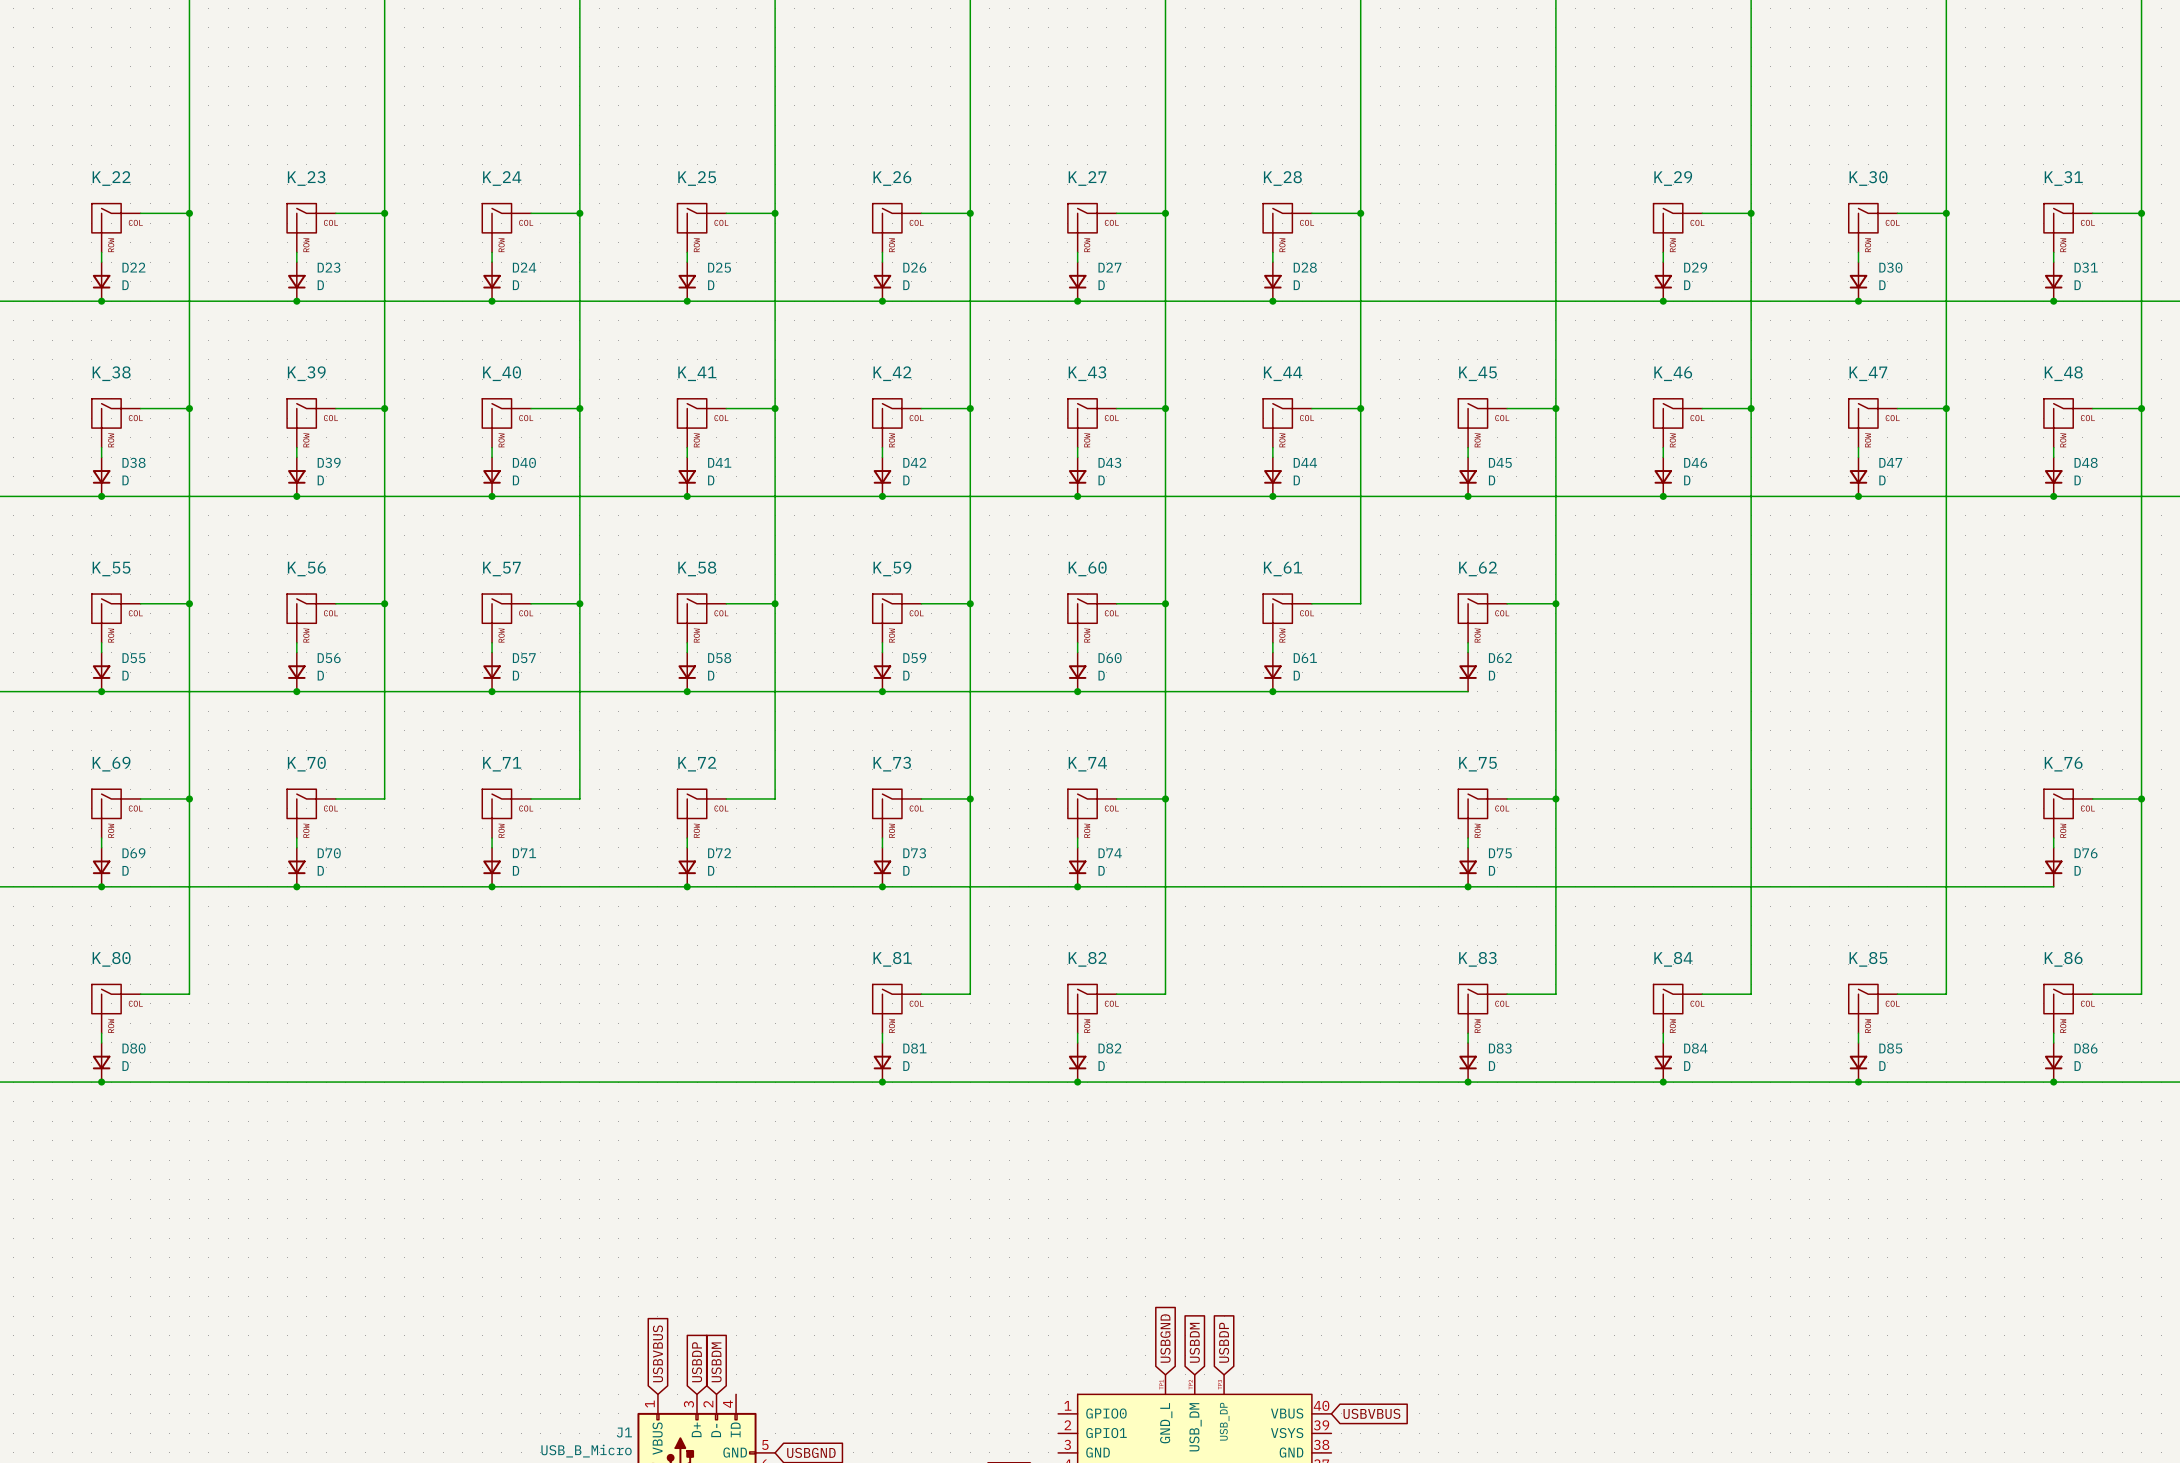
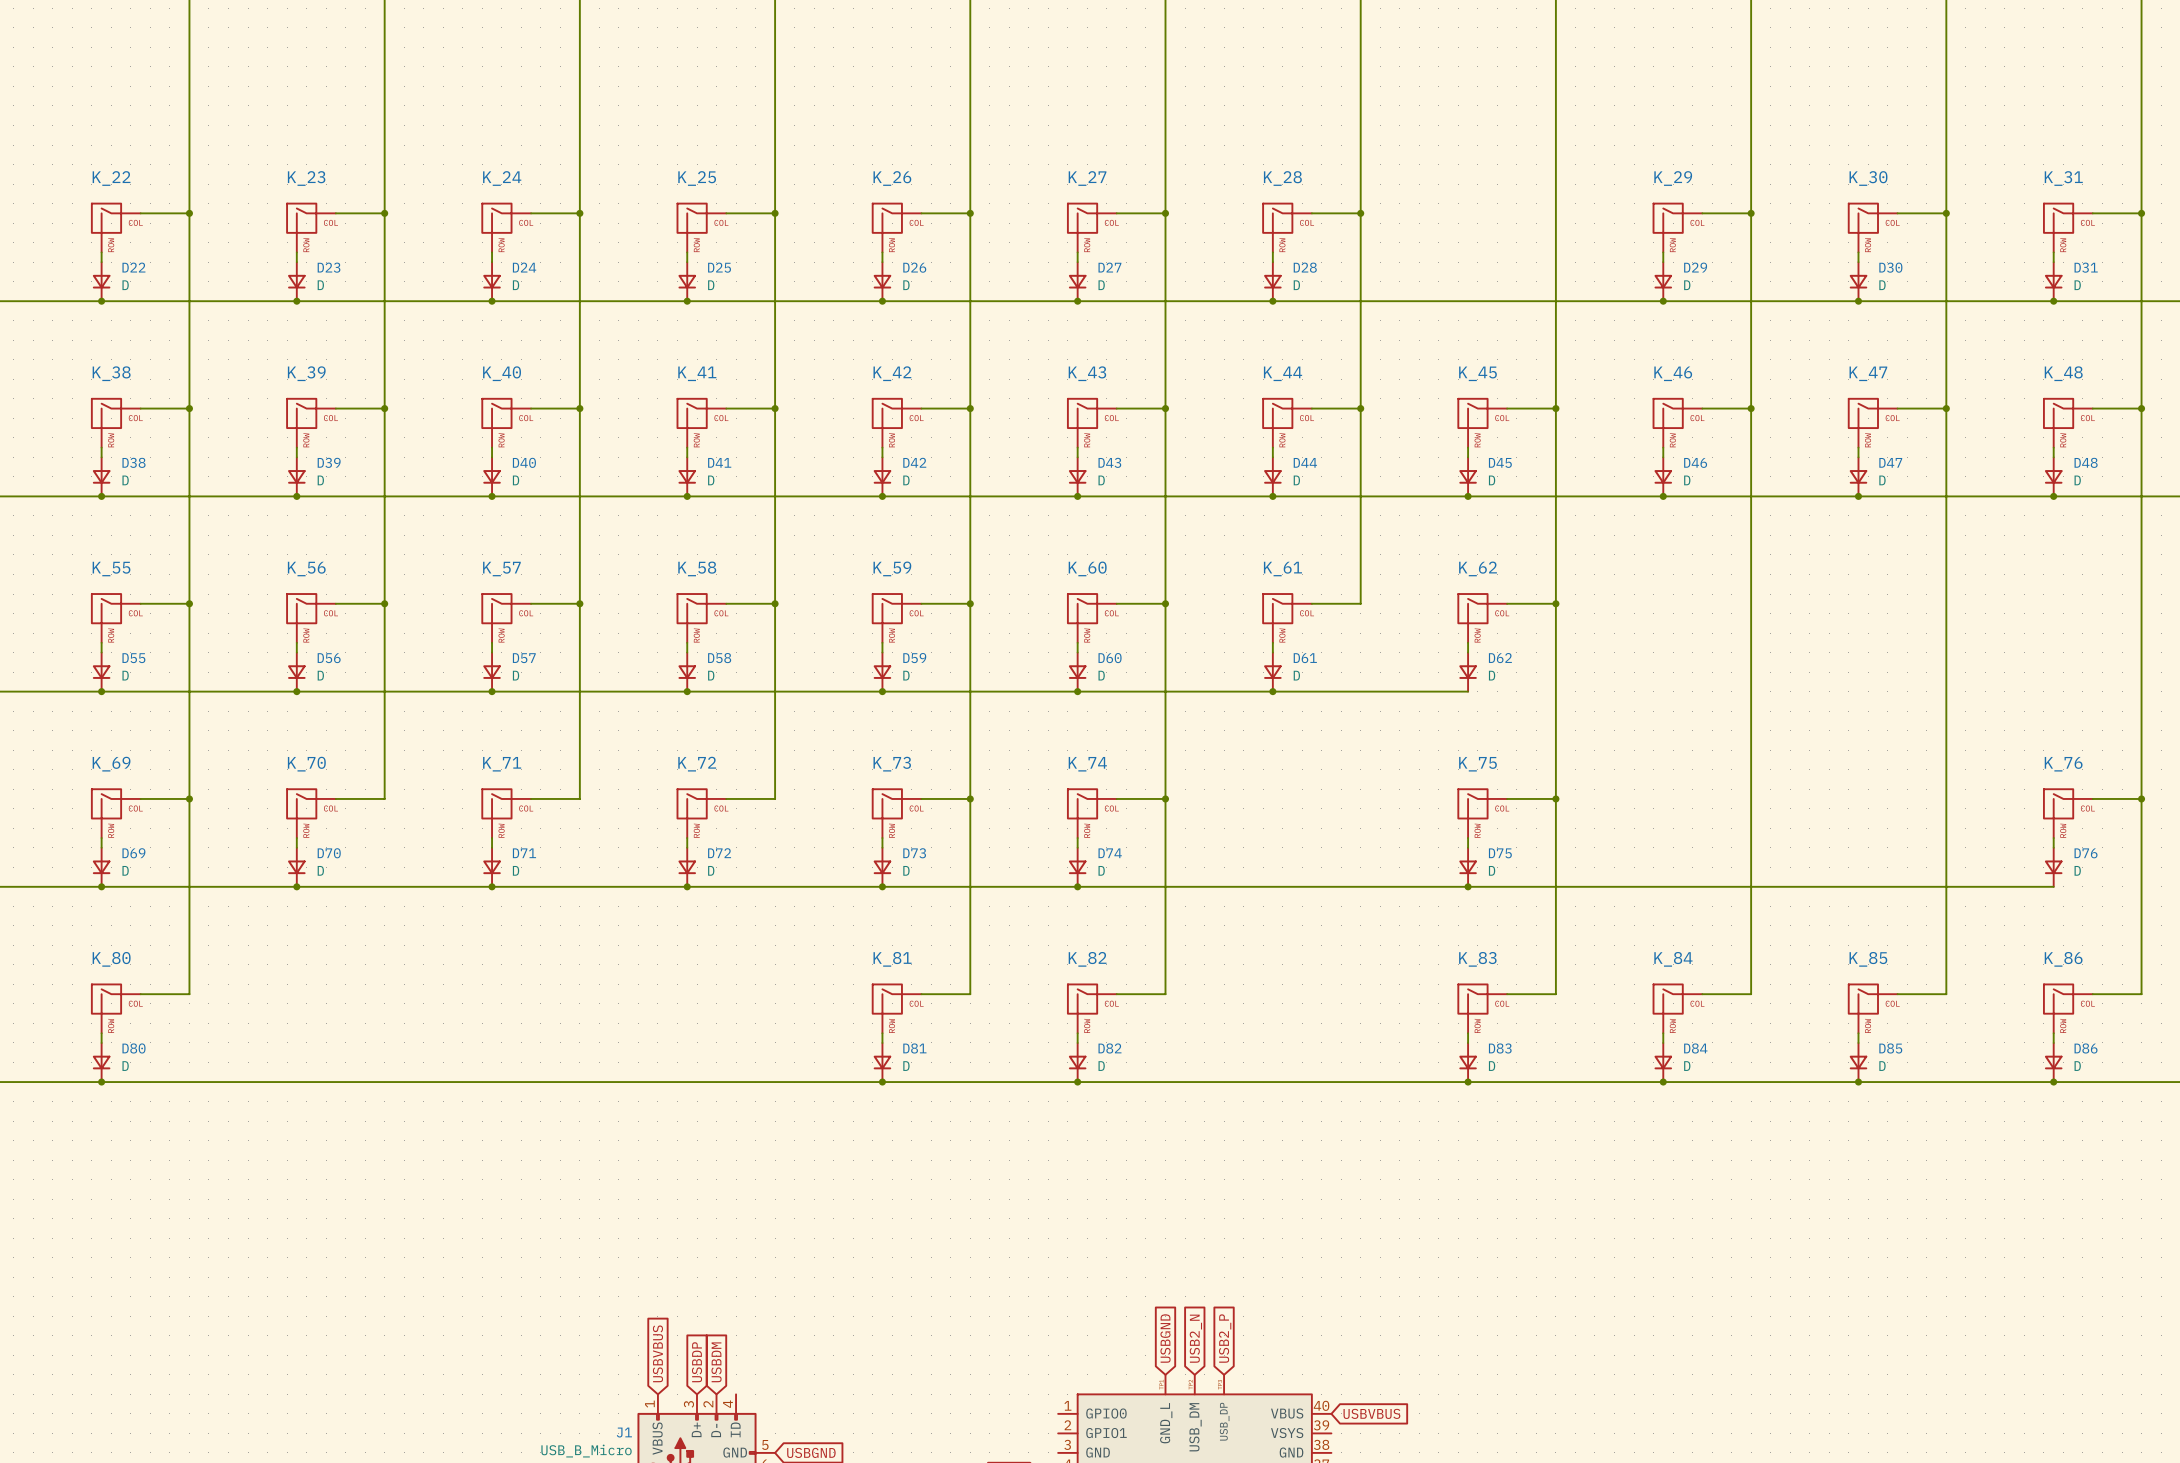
global label: USBDM (1194, 1342) -> USB2_N (1195, 1338)
global label: USBDP (1224, 1342) -> USB2_P (1225, 1338)

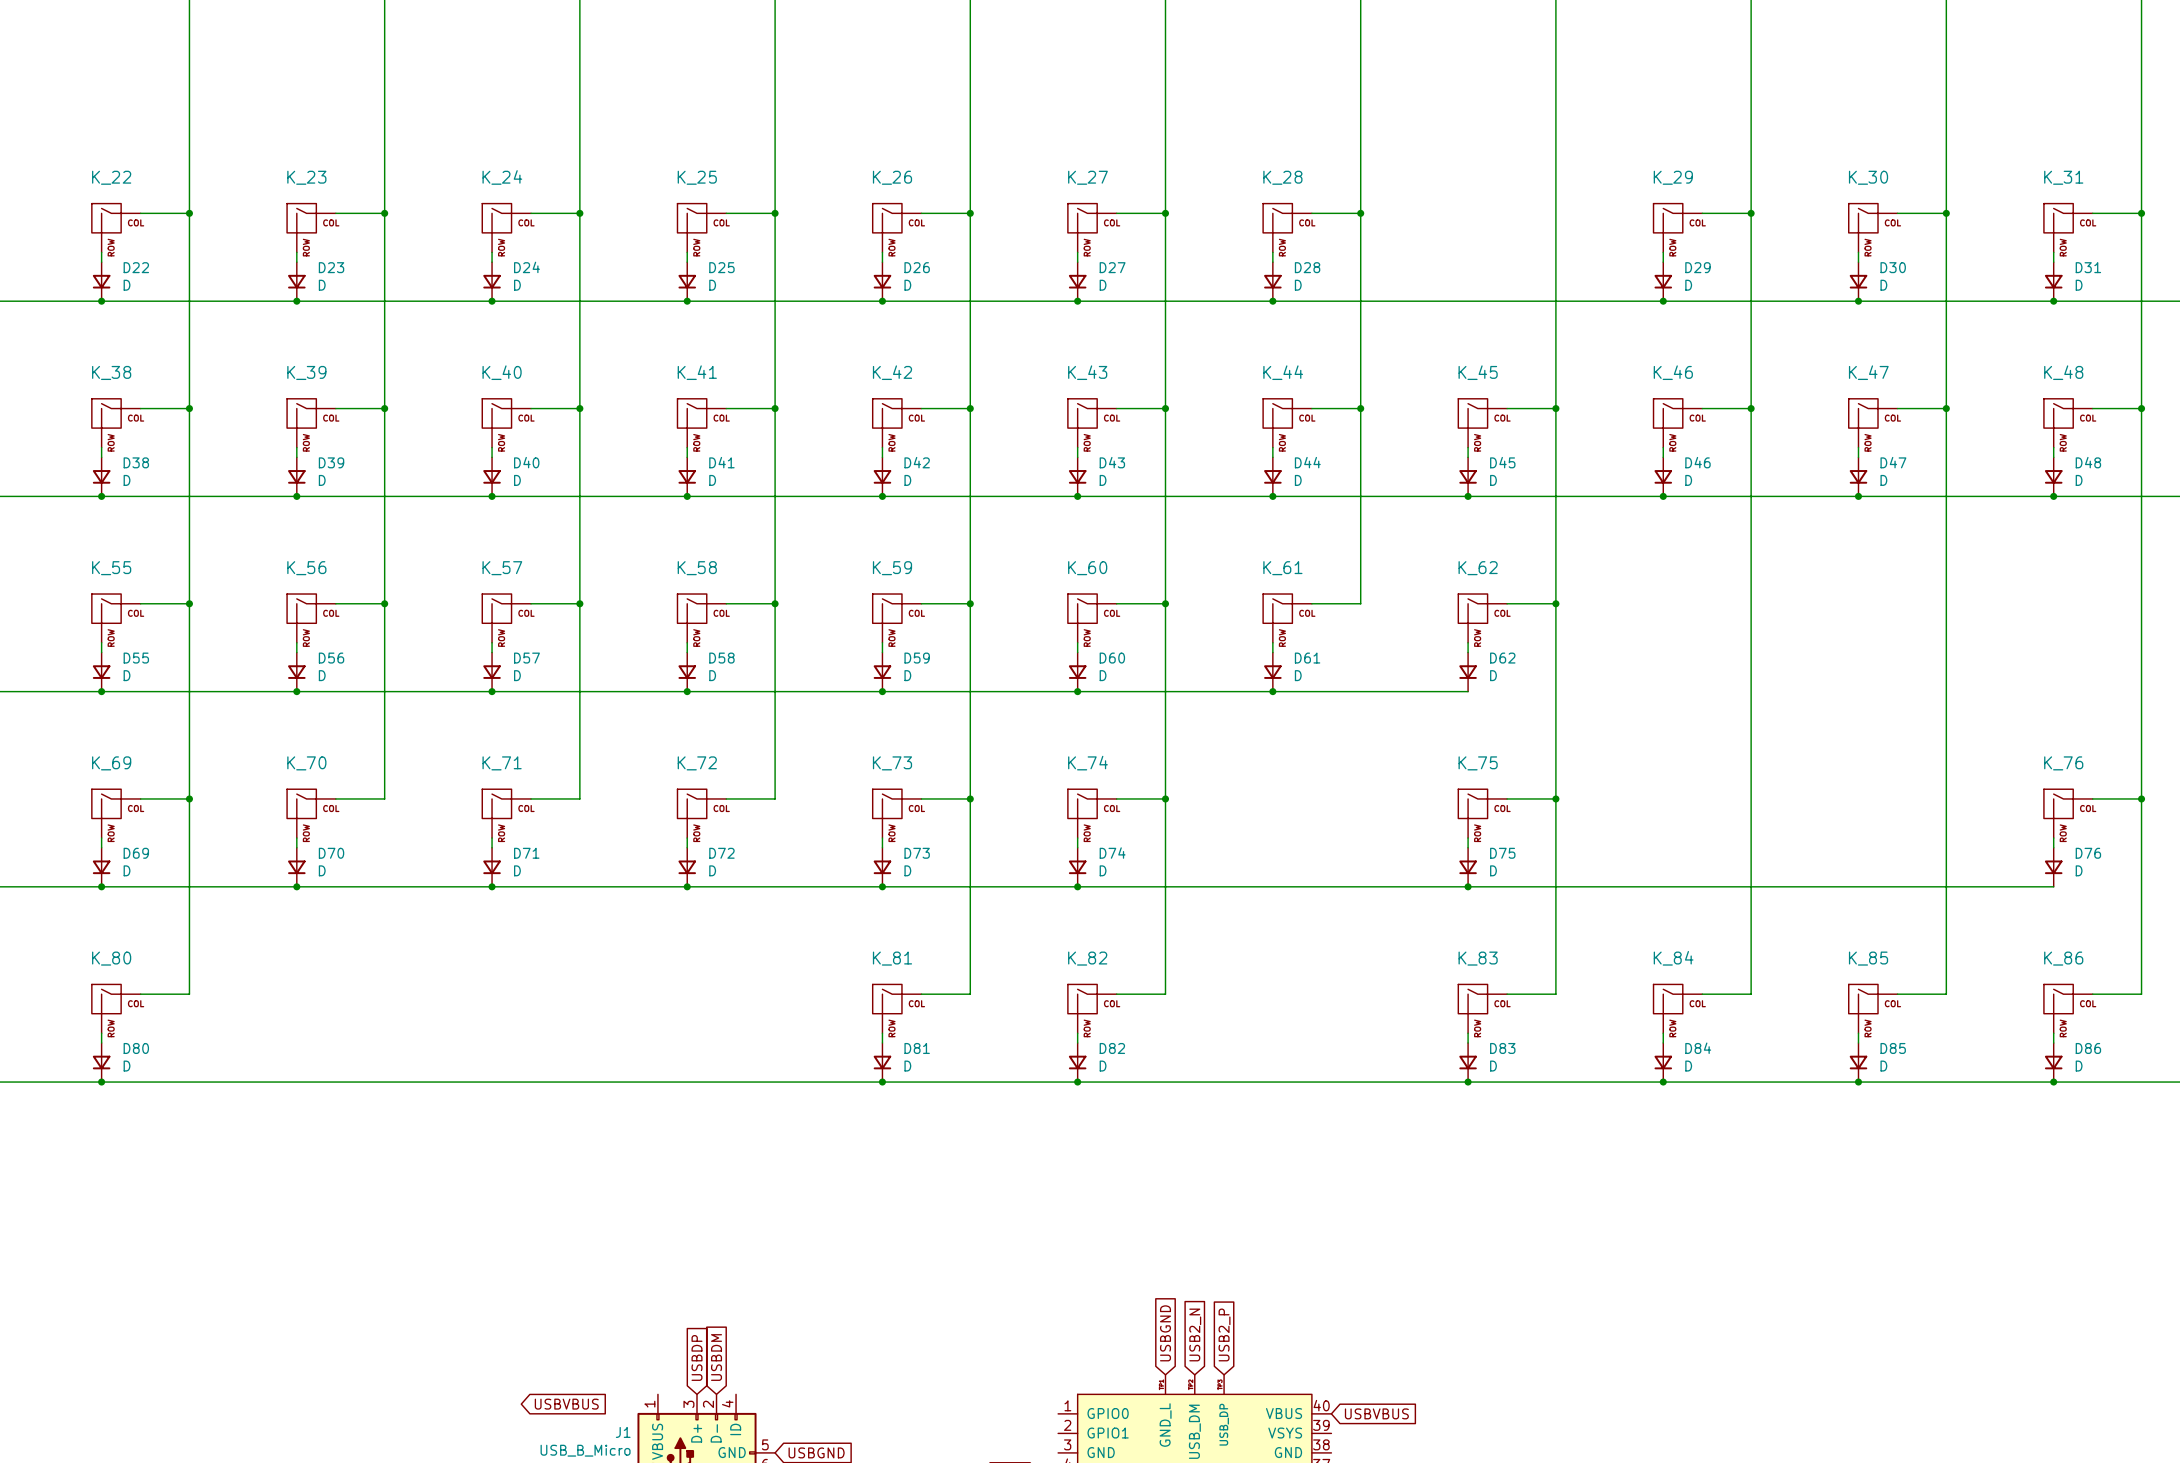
global label rotation: 0° (657, 1353) -> 90° clockwise (566, 1404)
global label position: USBVBUS (657, 1353) -> USBVBUS (566, 1404)

